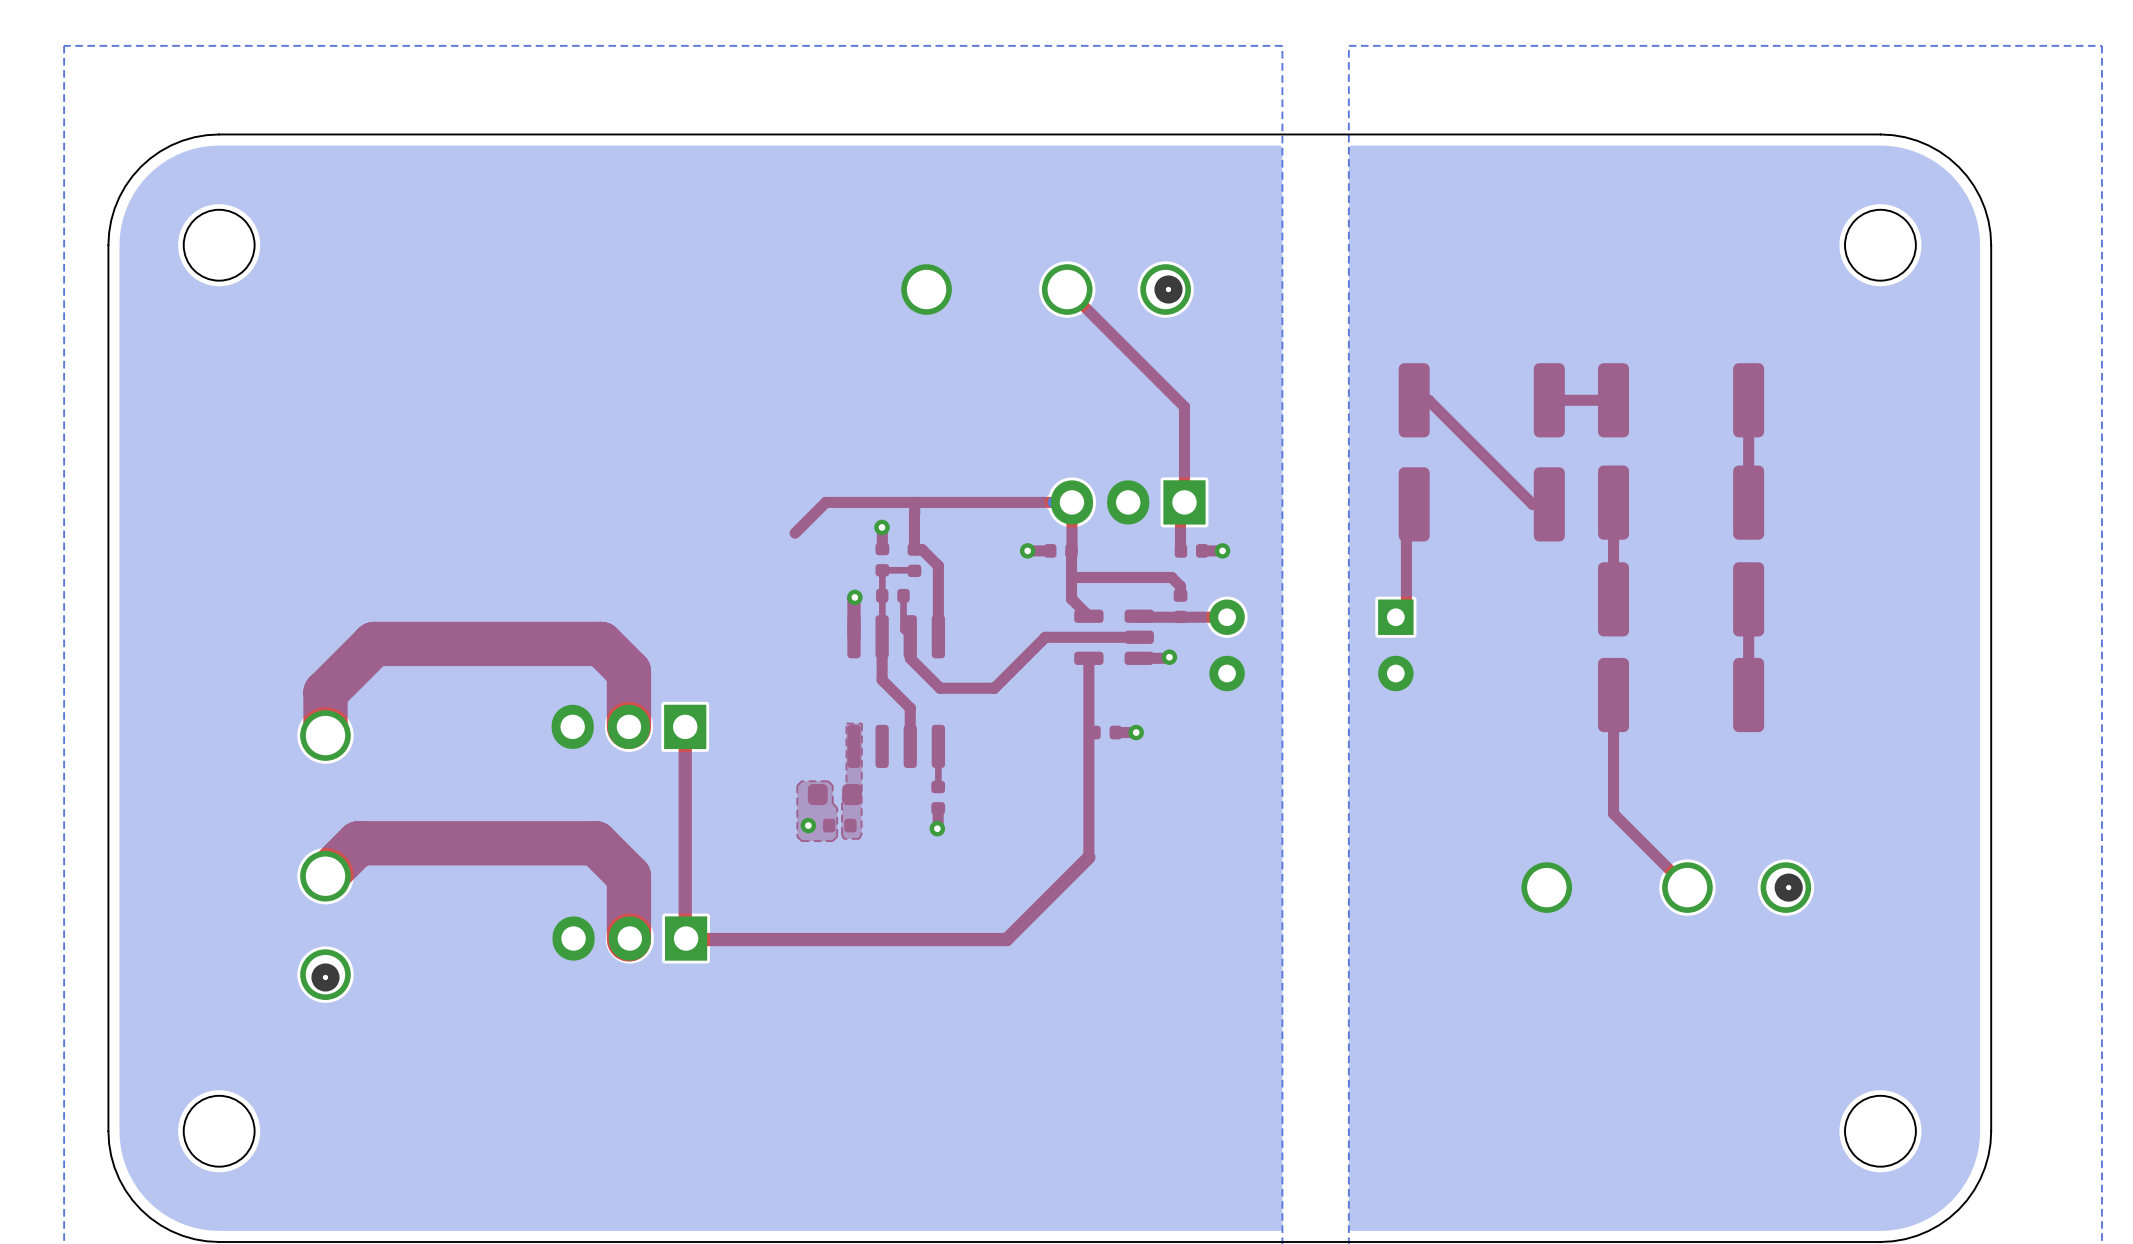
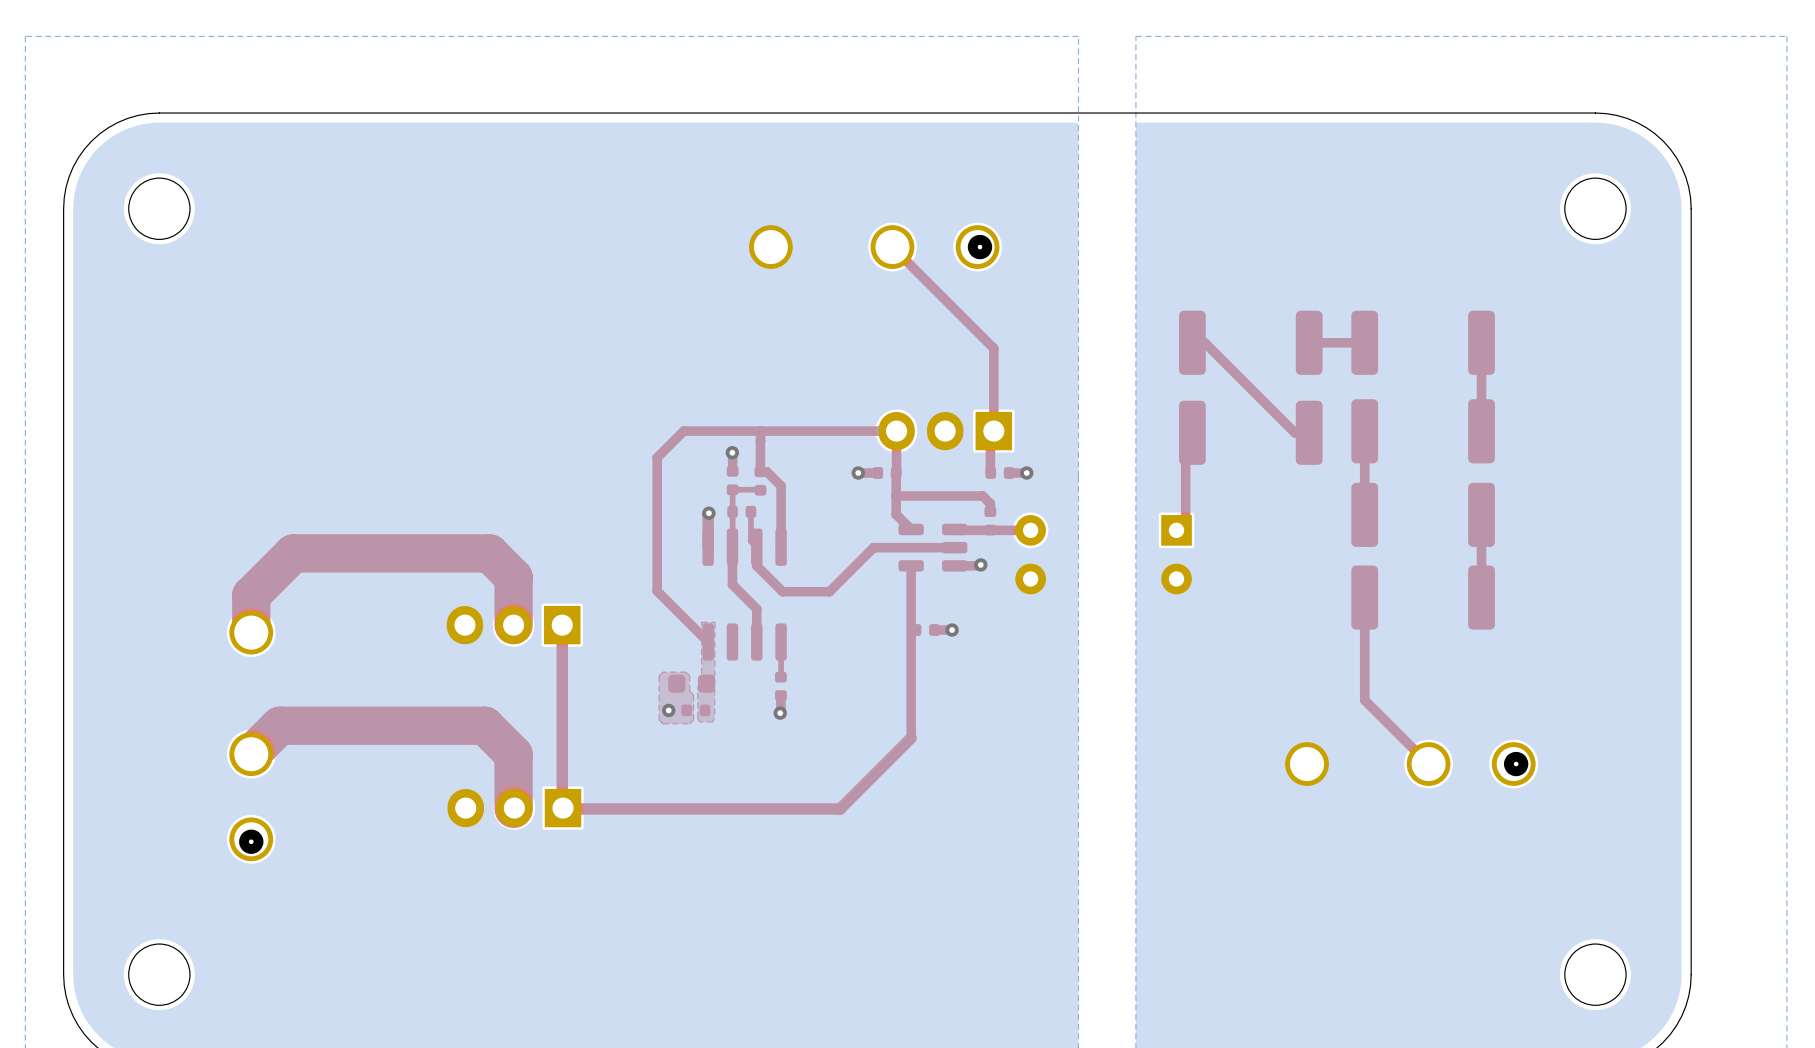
top track: none -> (657, 457) (657, 591) (708, 642)

